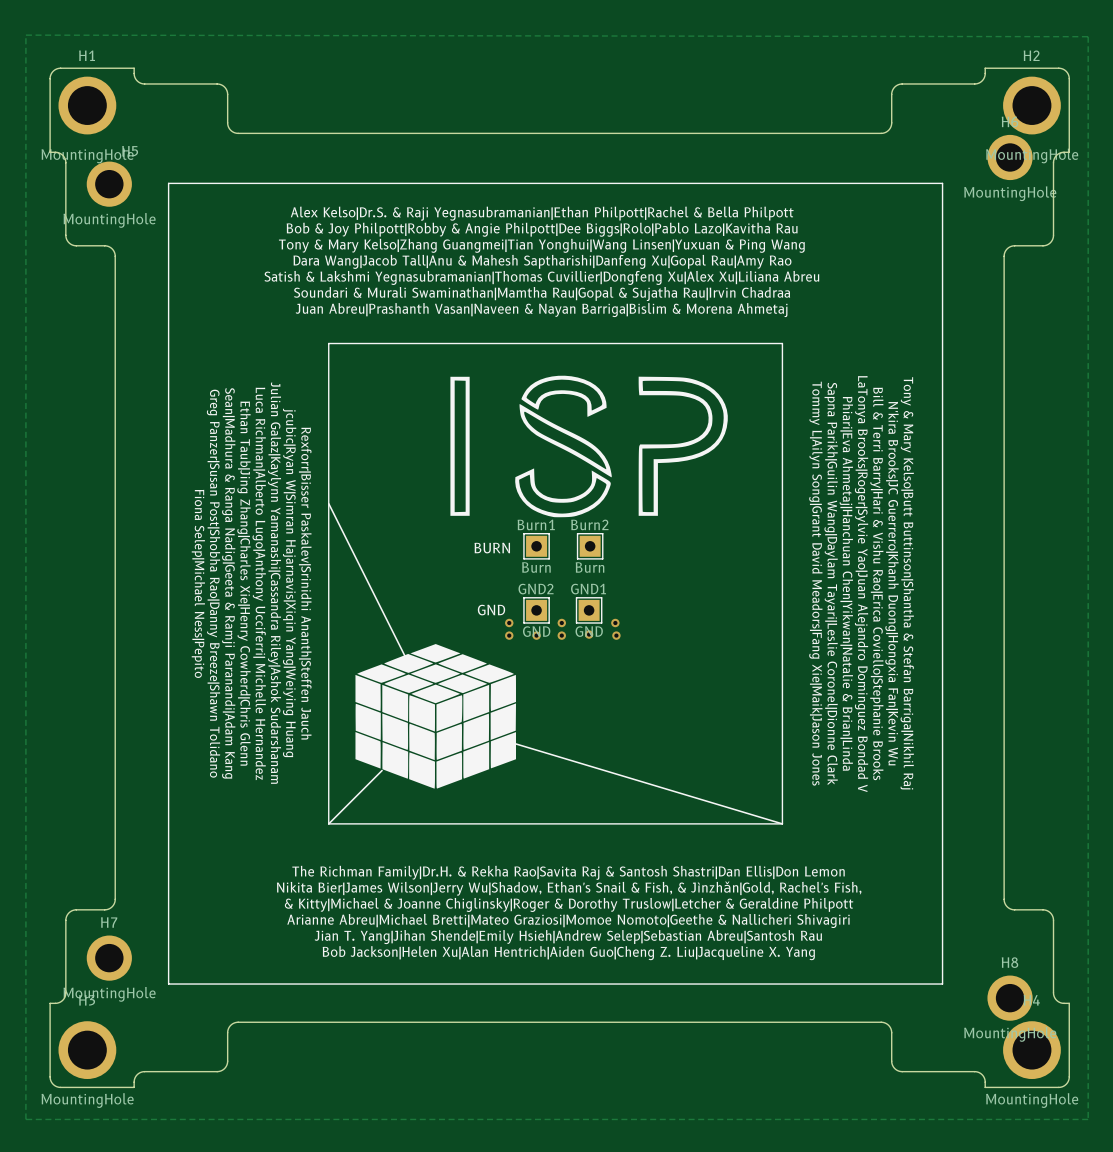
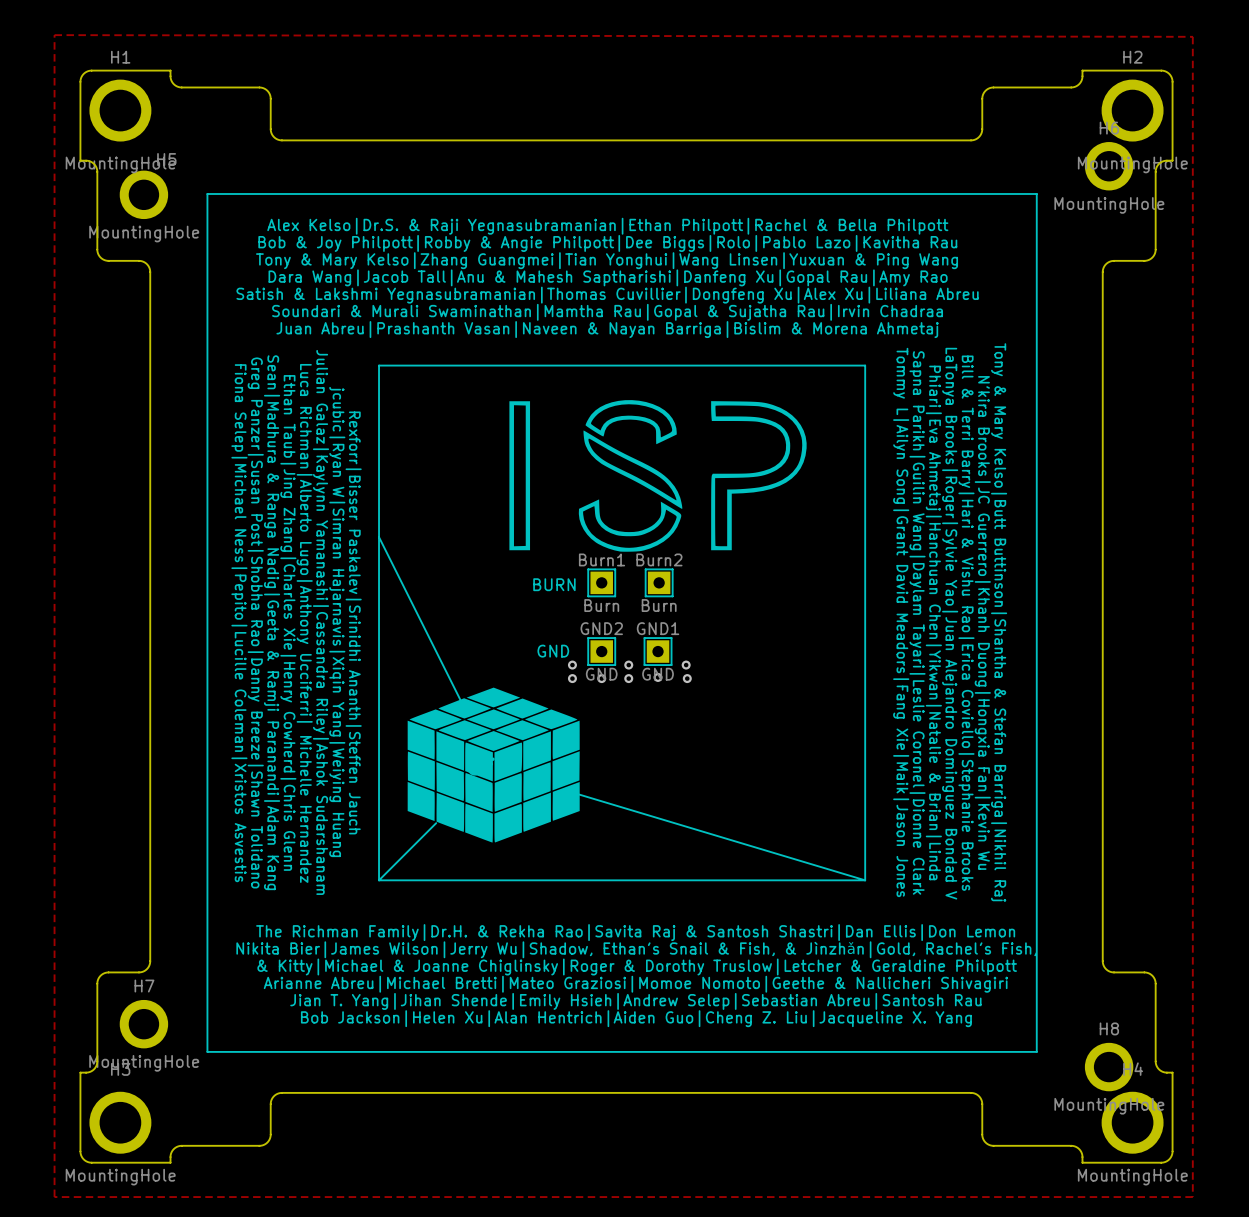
text: Fiona Selep|Michael Ness|Pepito (198, 583) -> Fiona Selep|Michael Ness|Pepito|Lucille Coleman|Xristos Asvestis (239, 623)

